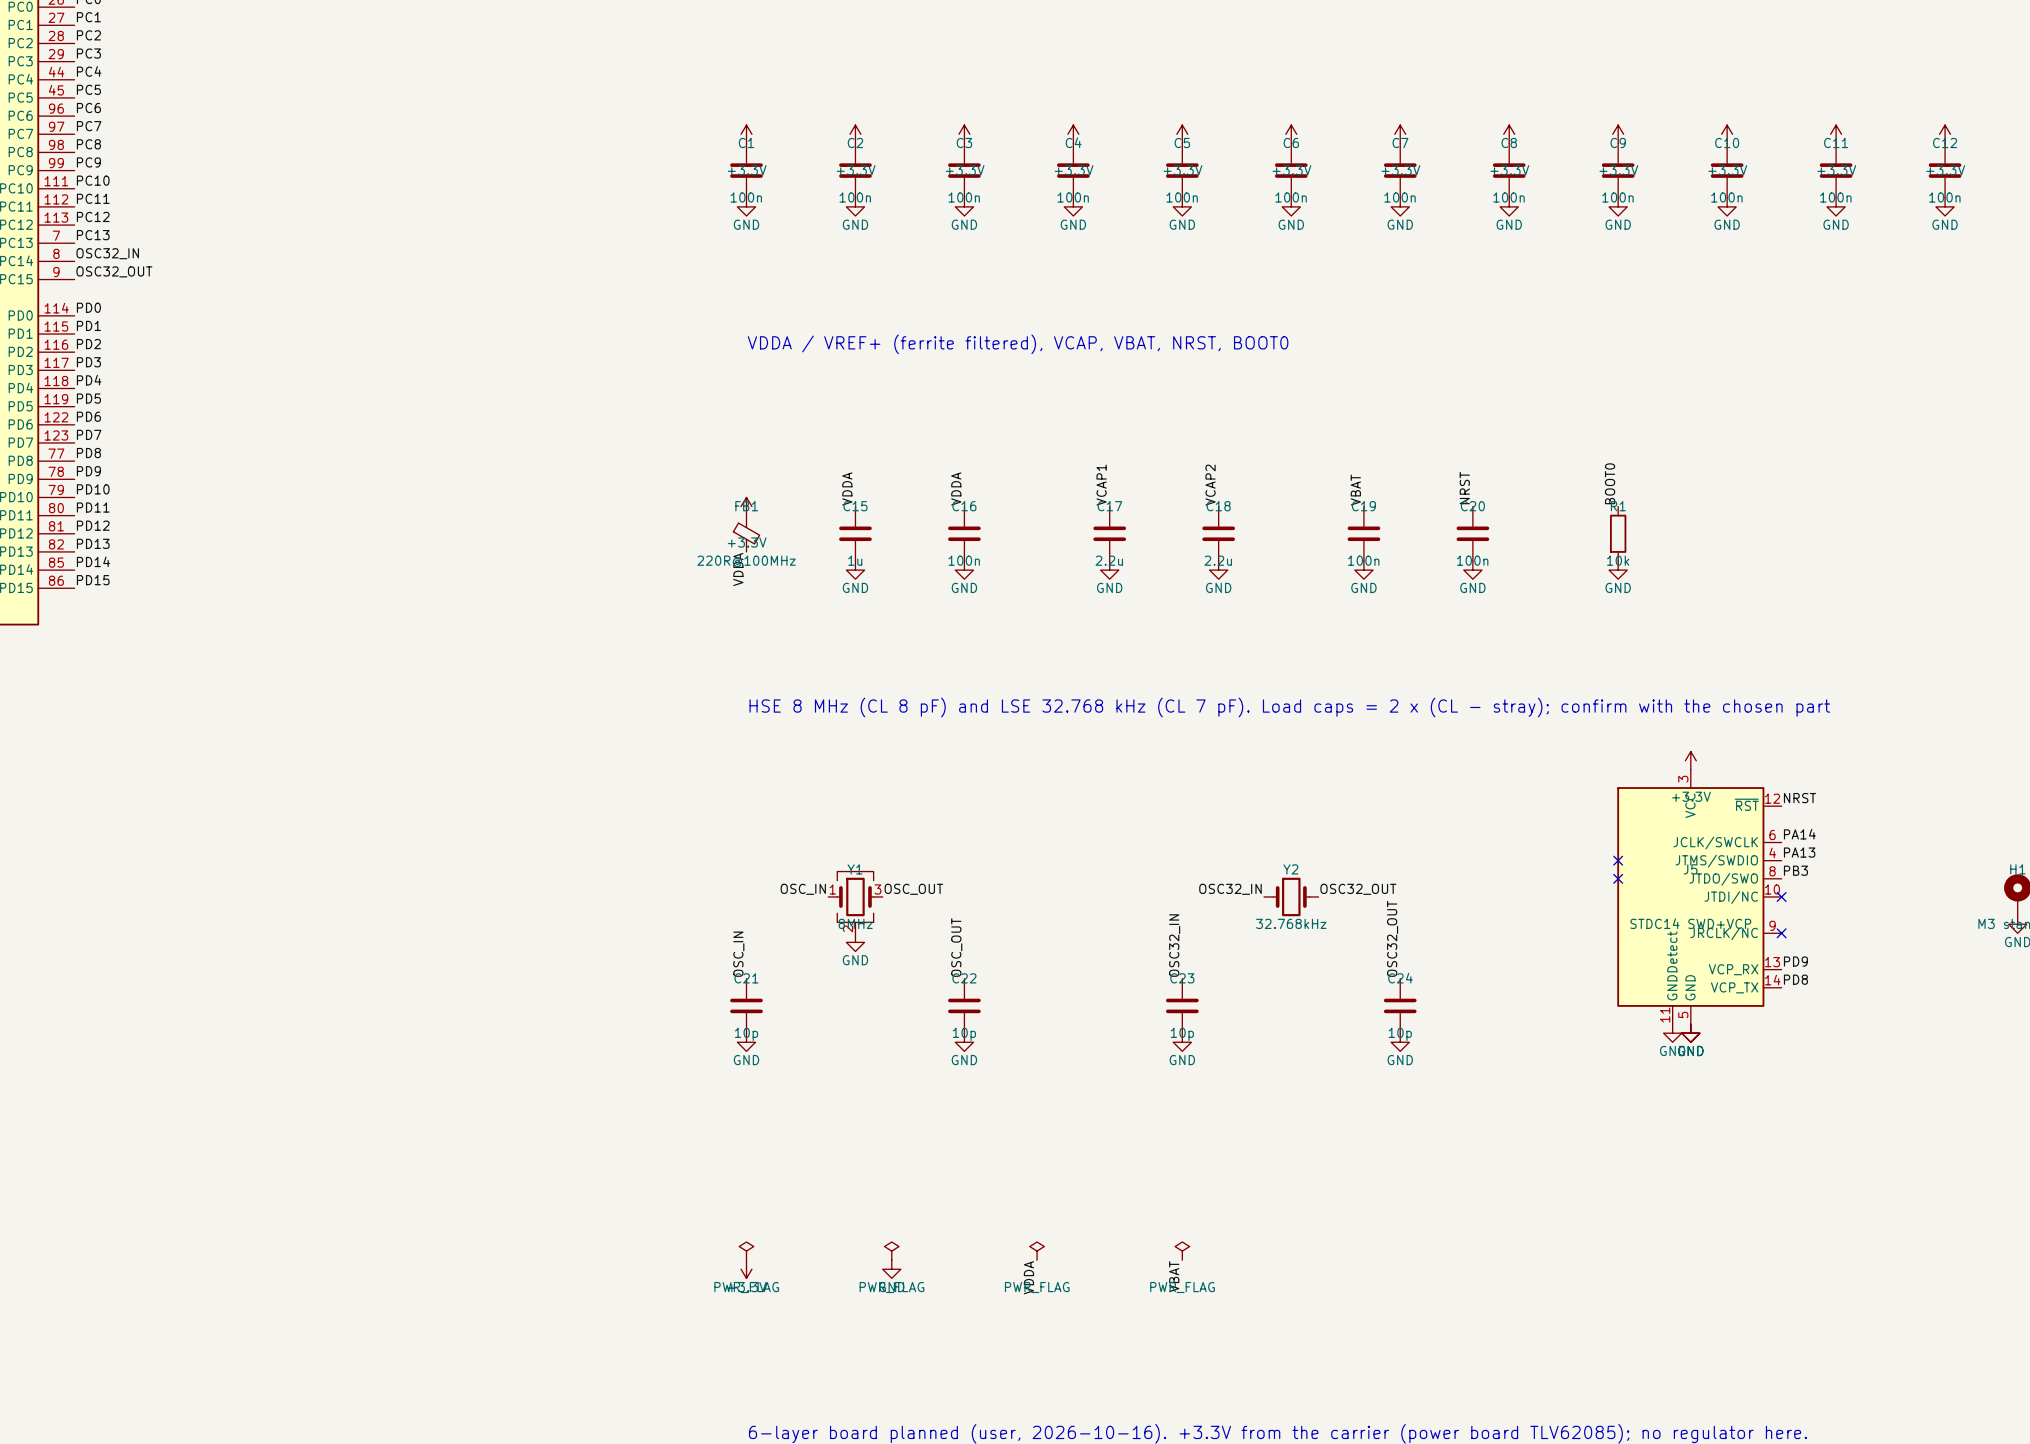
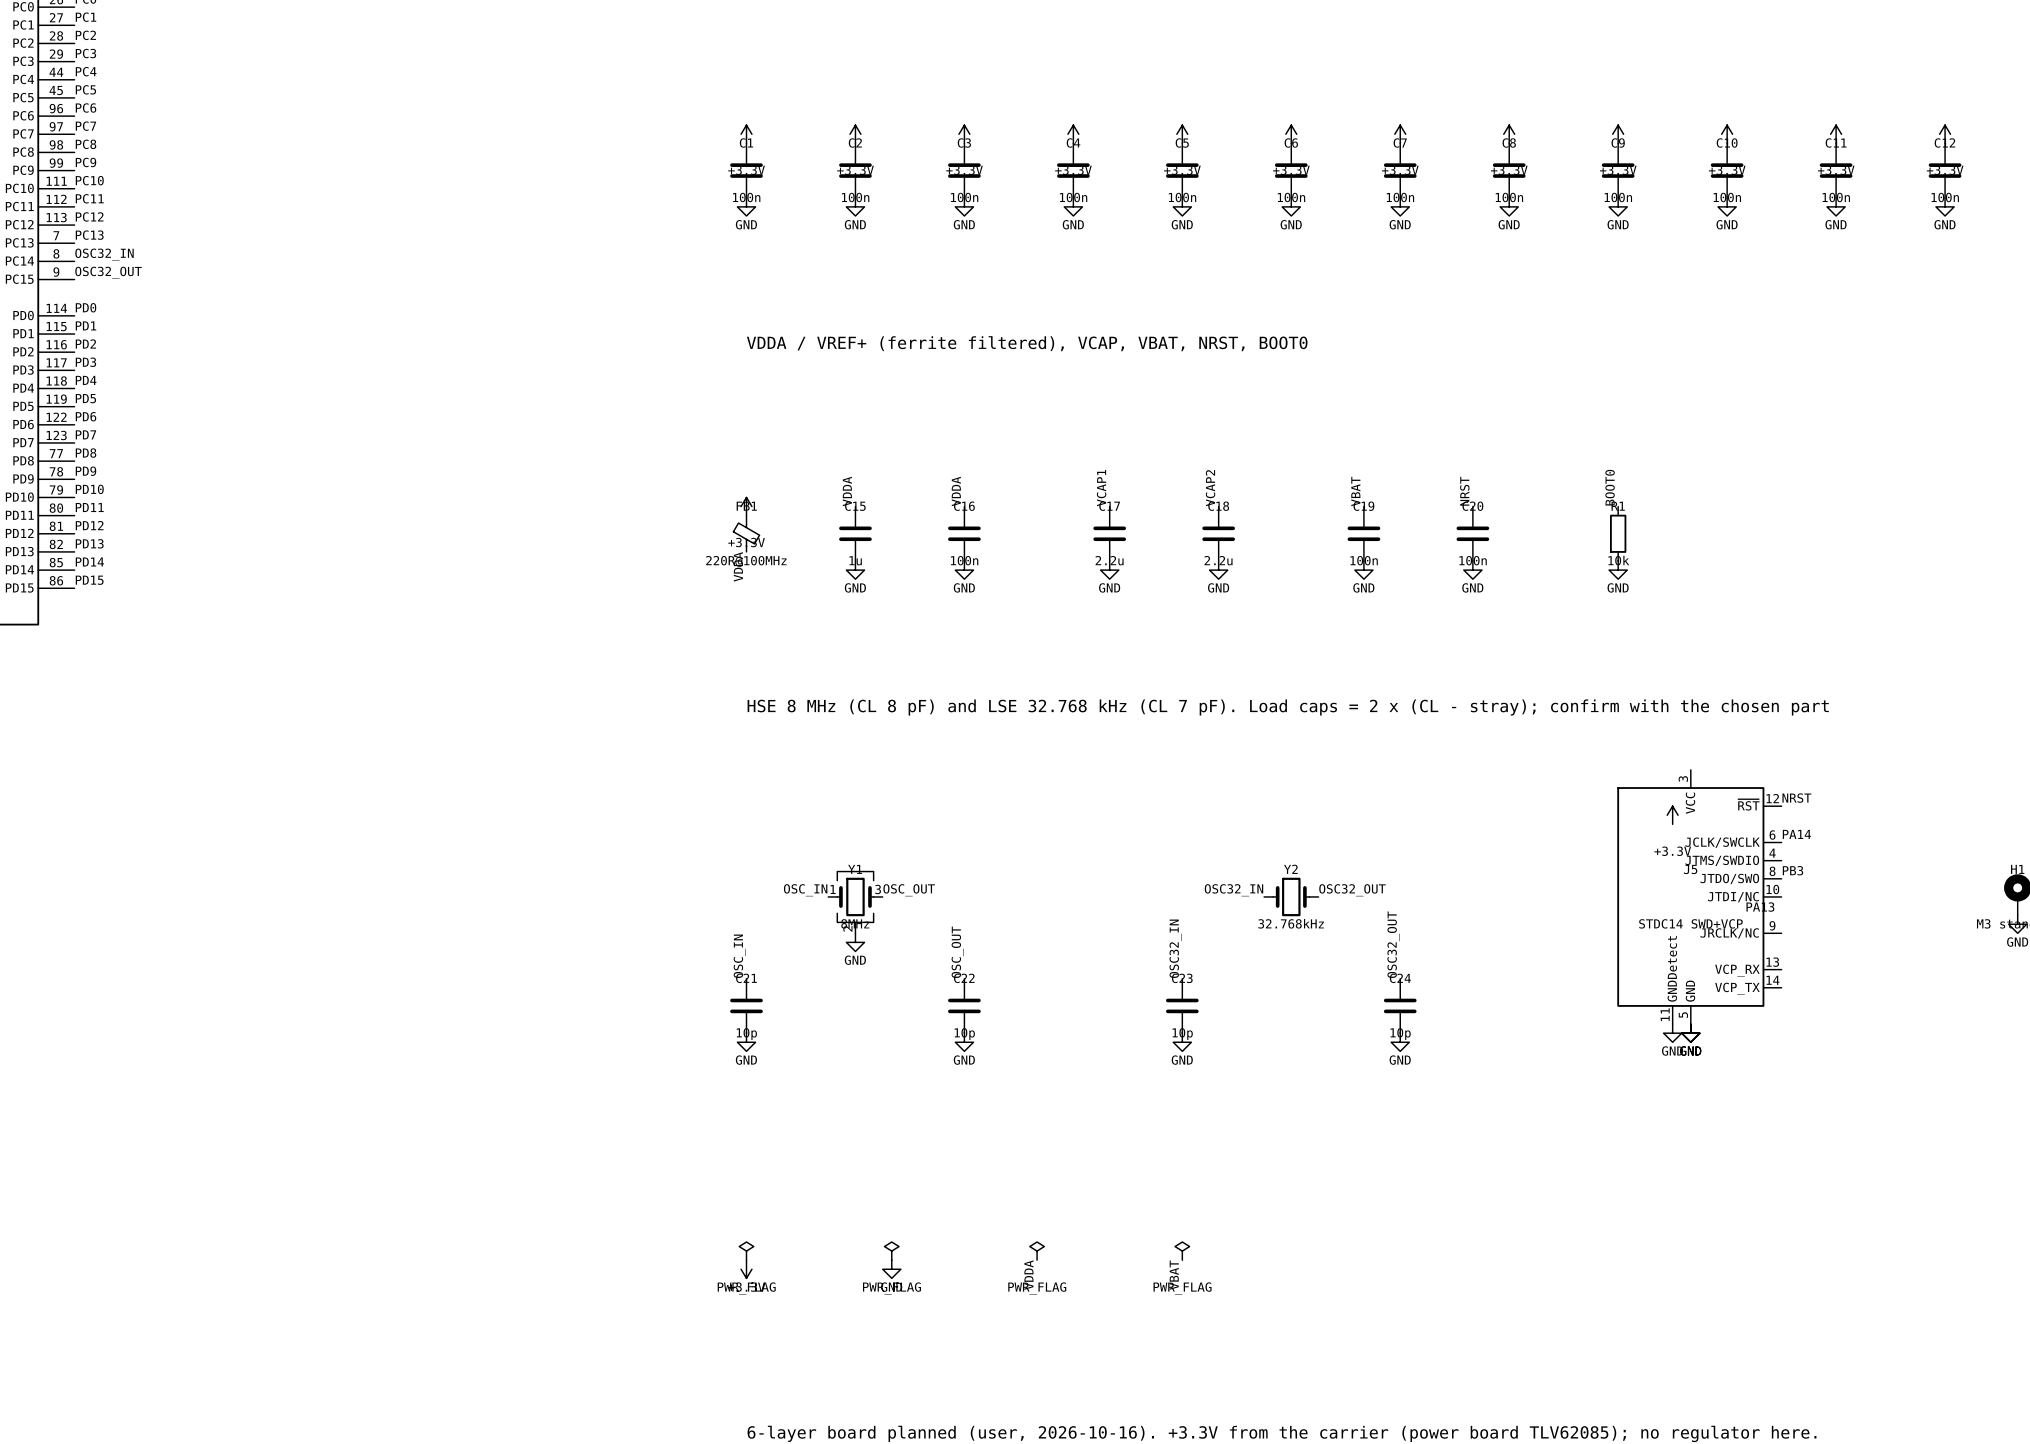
power symbol position: +3.3V (1690, 760) -> +3.3V (1672, 815)
label position: PA13 (1799, 852) -> PA13 (1760, 907)
no-connect mark: (1618, 860) -> none
no-connect mark: (1618, 878) -> none
no-connect mark: (1781, 896) -> none
no-connect mark: (1781, 933) -> none
label: PD9 (1795, 961) -> none
label: PD8 (1795, 979) -> none

